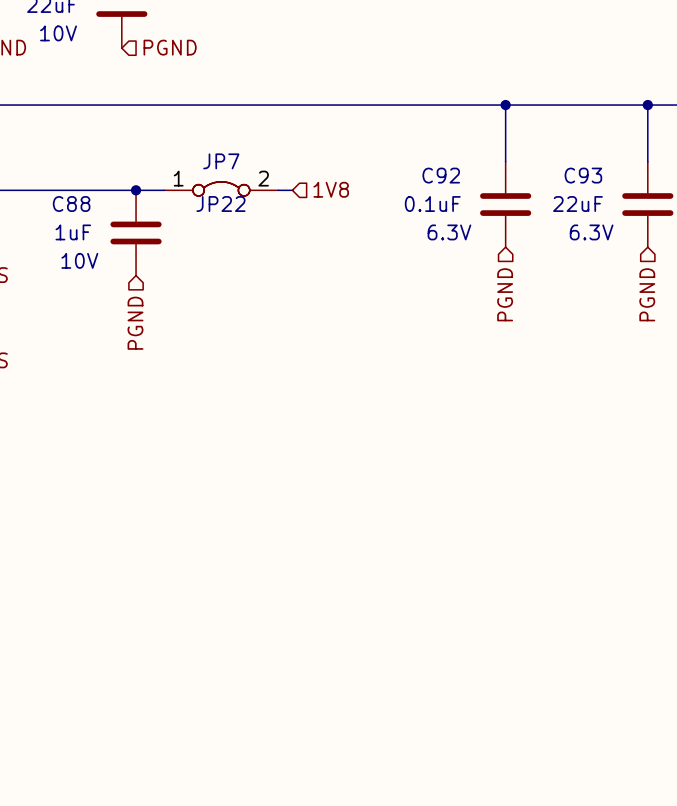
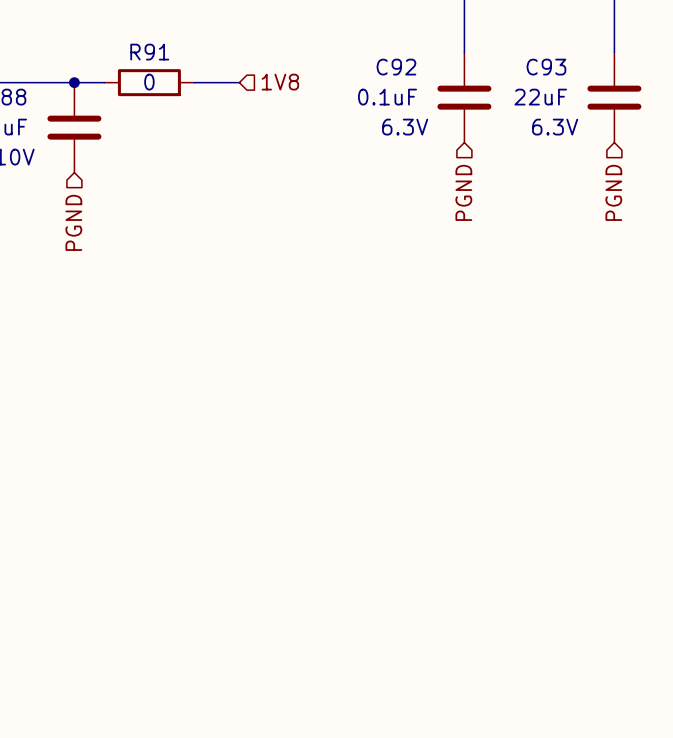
JP22: (221, 188) -> none
JP7: (221, 188) -> none
R91: none -> 0 (149, 82)

